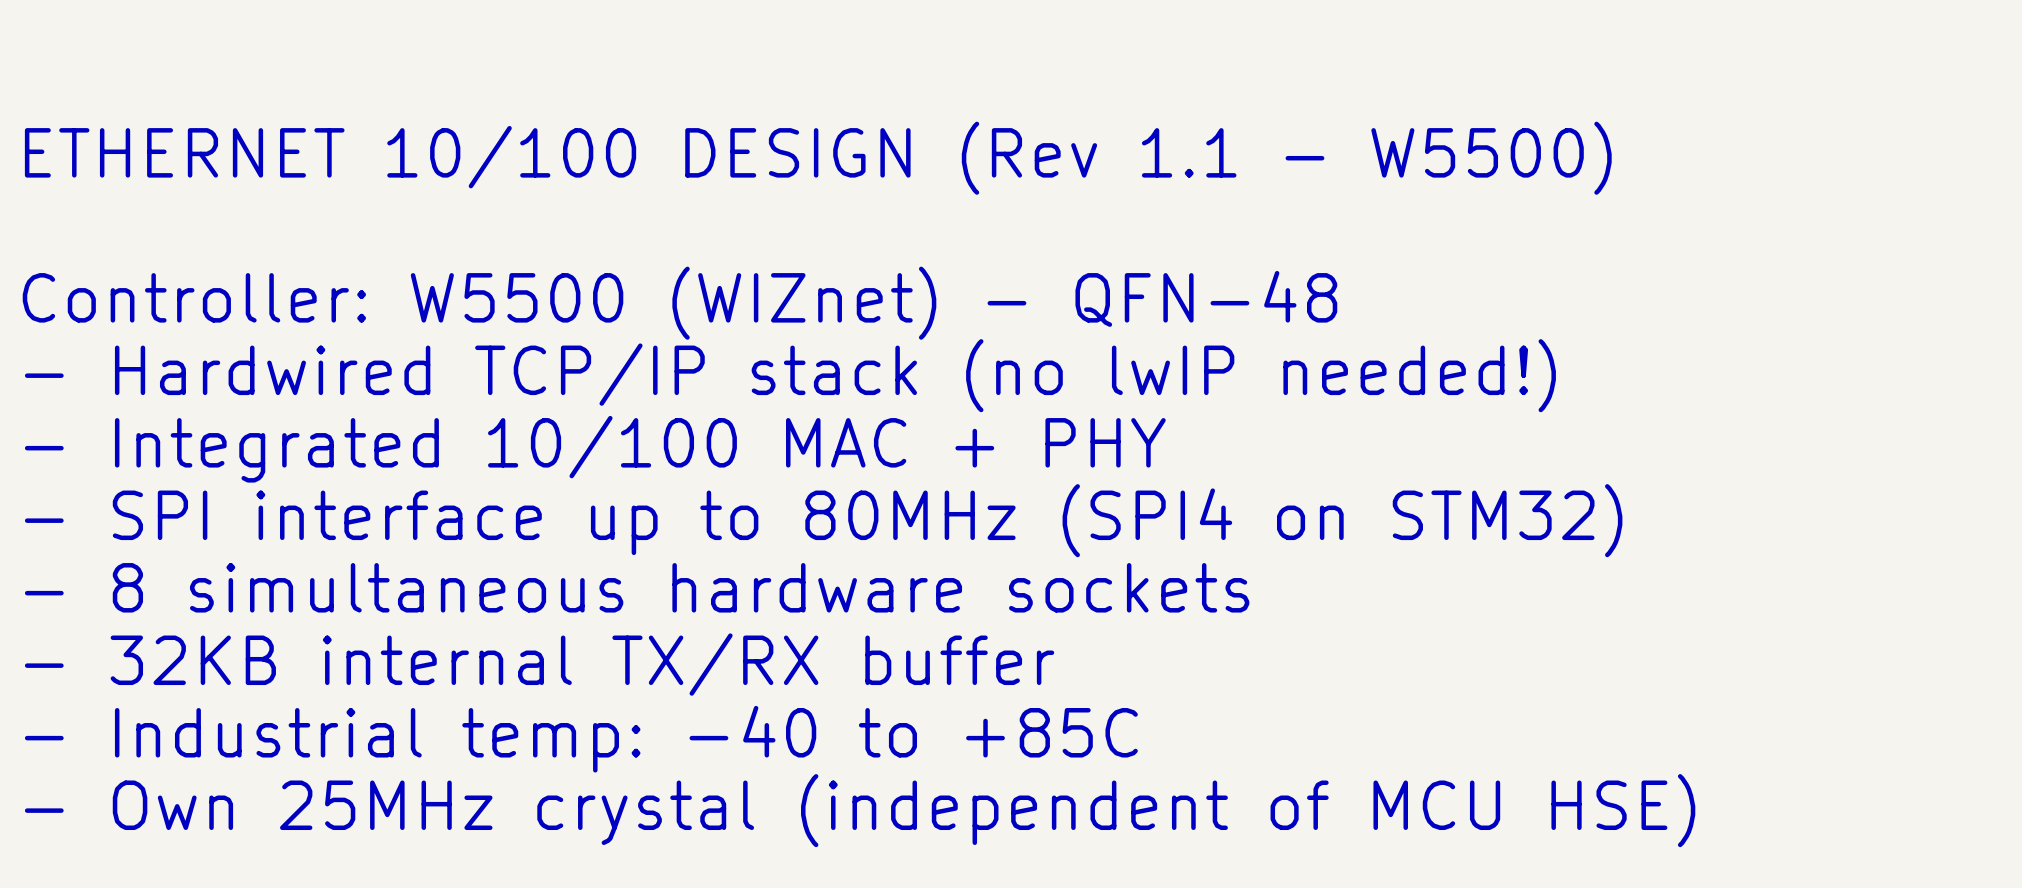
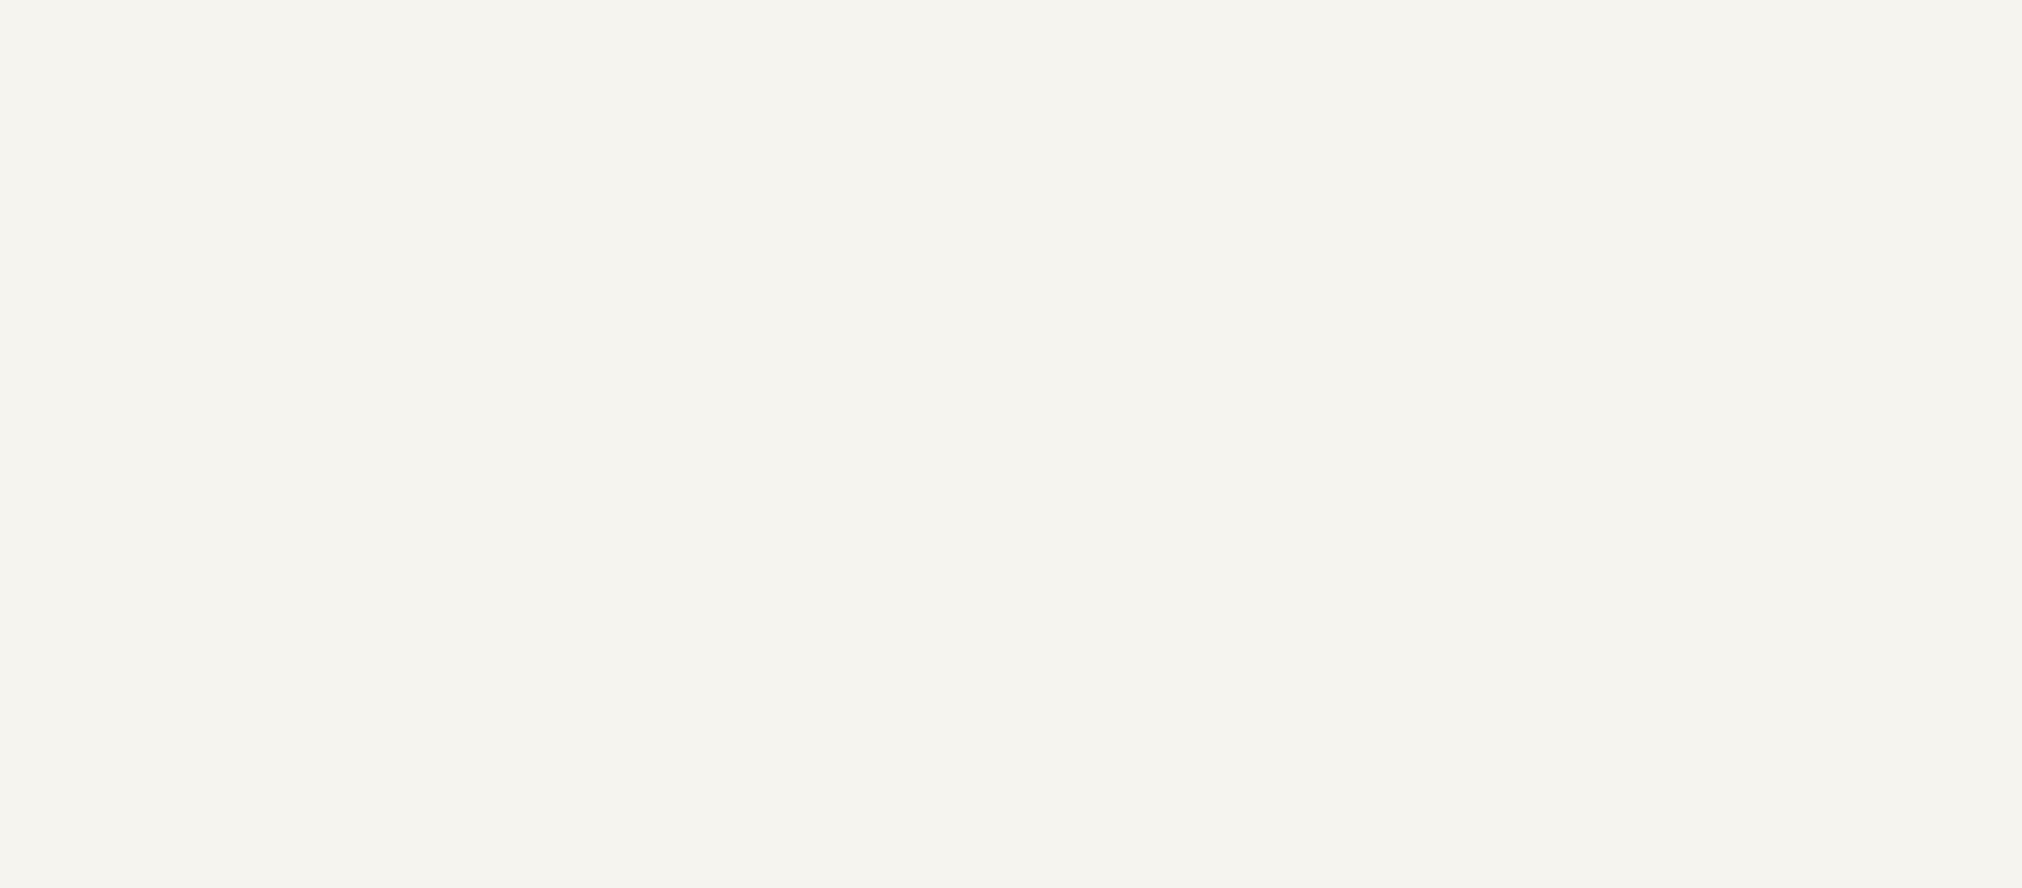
text: ETHERNET 10/100 DESIGN (Rev 1.1 - W5500) (818, 158) -> none
text: Controller: W5500 (WIZnet) - QFN-48 (679, 303) -> none
text: - Hardwired TCP/IP stack (no lwIP needed!) (790, 375) -> none
text: - Integrated 10/100 MAC + PHY (595, 449) -> none
text: - SPI interface up to 80MHz (SPI4 on STM32) (823, 520) -> none
text: - 8 simultaneous hardware sockets (637, 587) -> none
text: - 32KB internal TX/RX buffer (539, 664) -> none
text: - Industrial temp: -40 to +85C (581, 739) -> none
text: - Own 25MHz crystal (independent of MCU HSE) (860, 810) -> none

